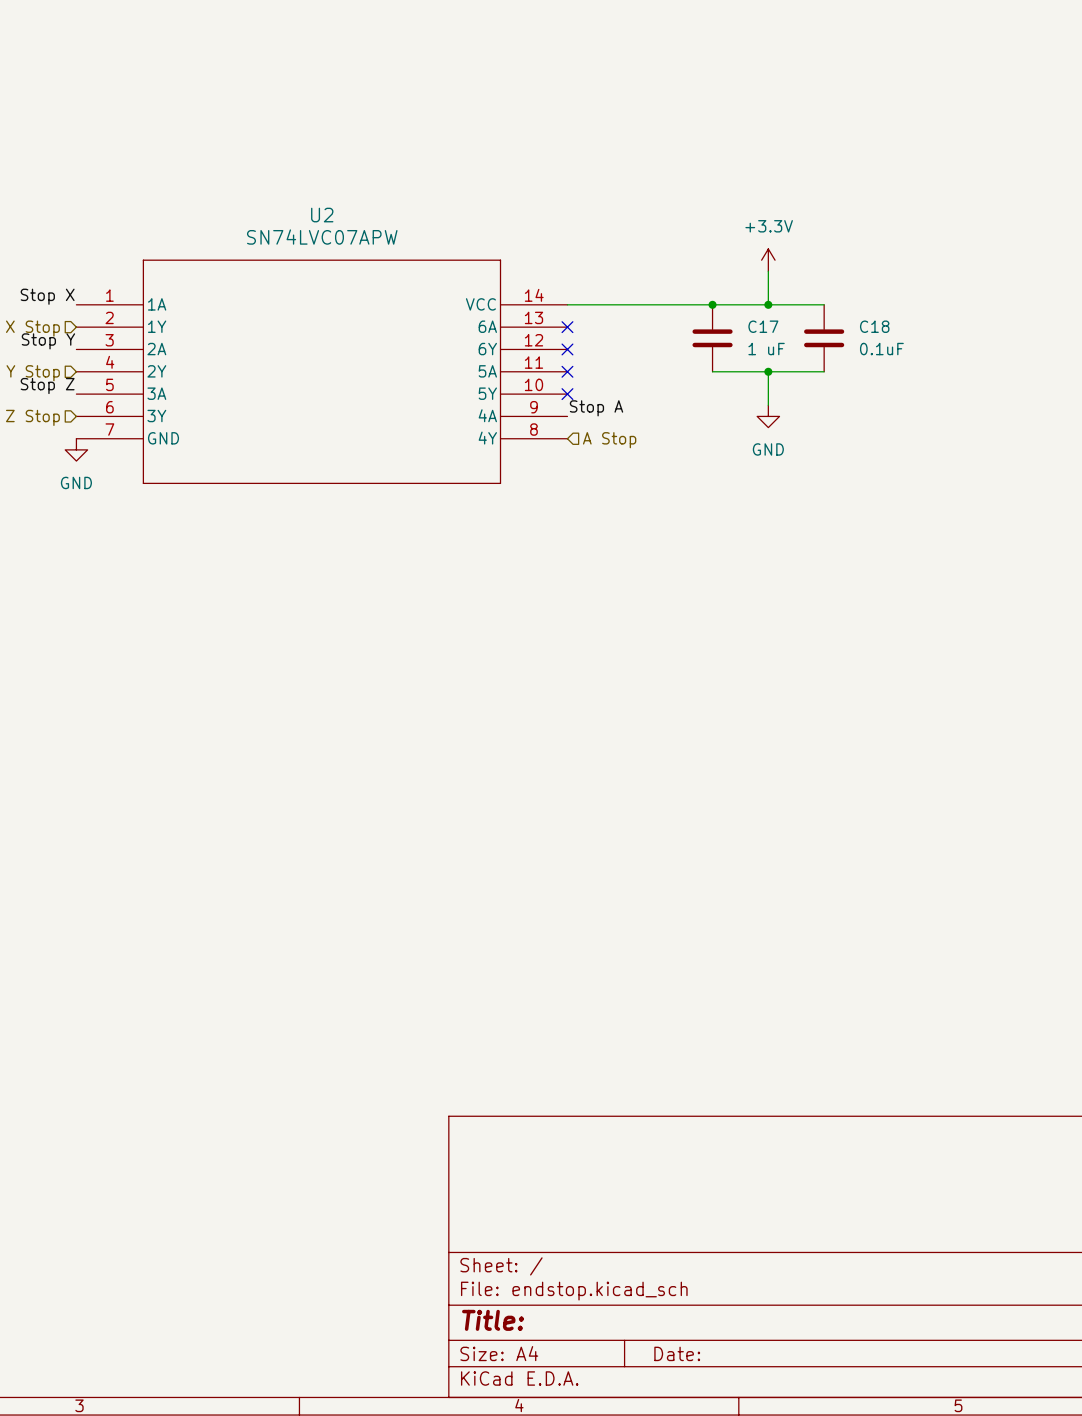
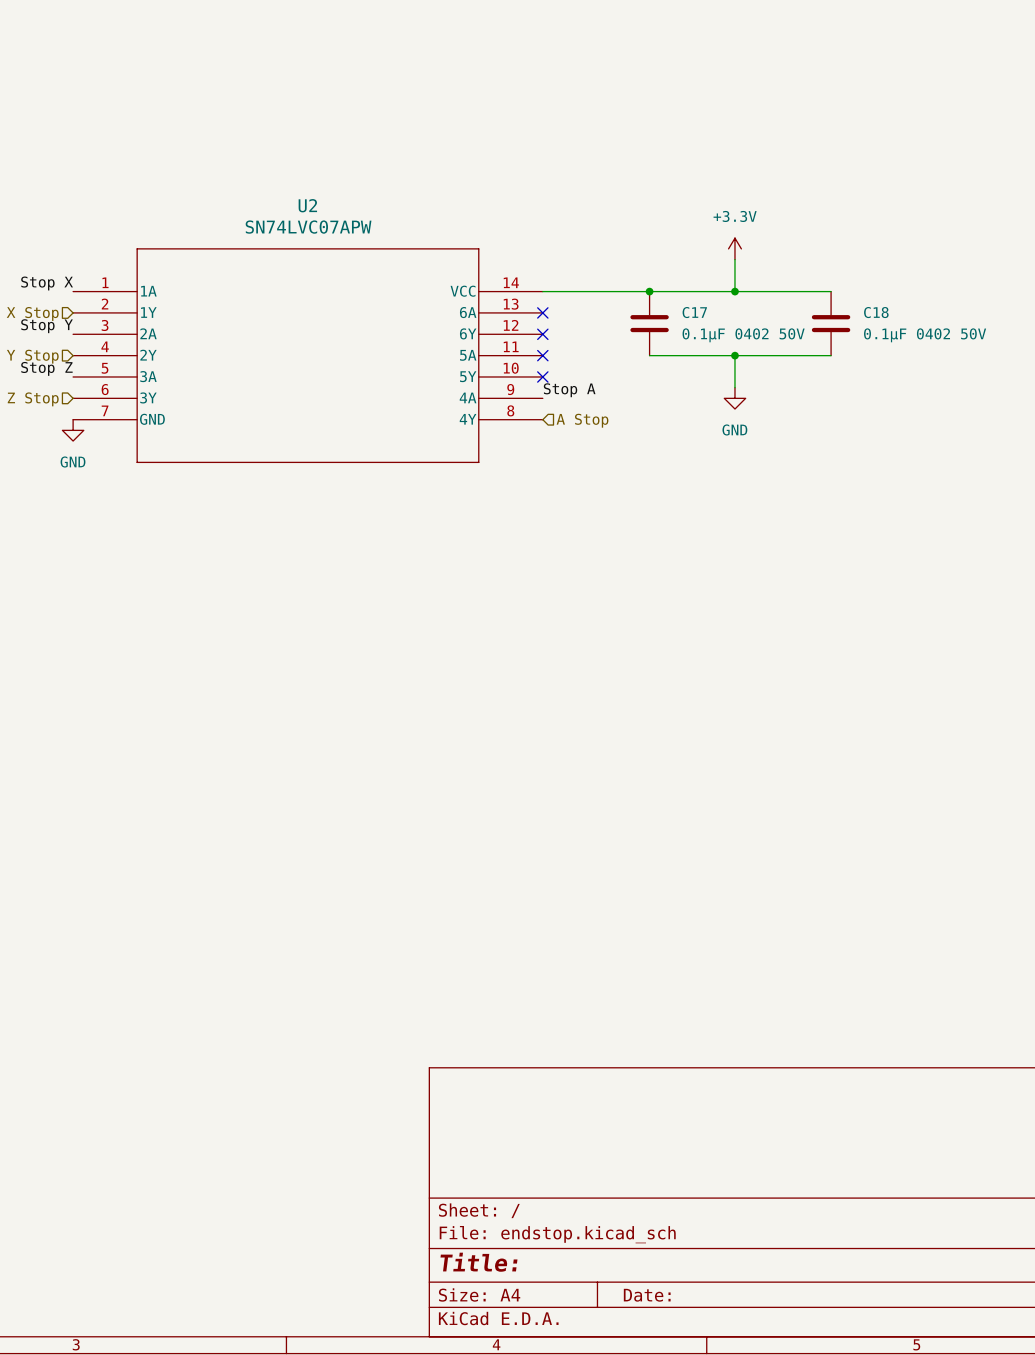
junction position: (712, 304) -> (649, 291)
wire: none -> (788, 291) (831, 291)
C17 position: (712, 338) -> (649, 323)
C18 position: (824, 338) -> (831, 323)
C17 value: 1 uF (766, 349) -> 0.1μF 0402 50V (743, 335)
C18 value: 0.1uF (881, 349) -> 0.1μF 0402 50V (925, 335)
wire: none -> (649, 355) (681, 355)
wire: none -> (788, 355) (831, 355)

